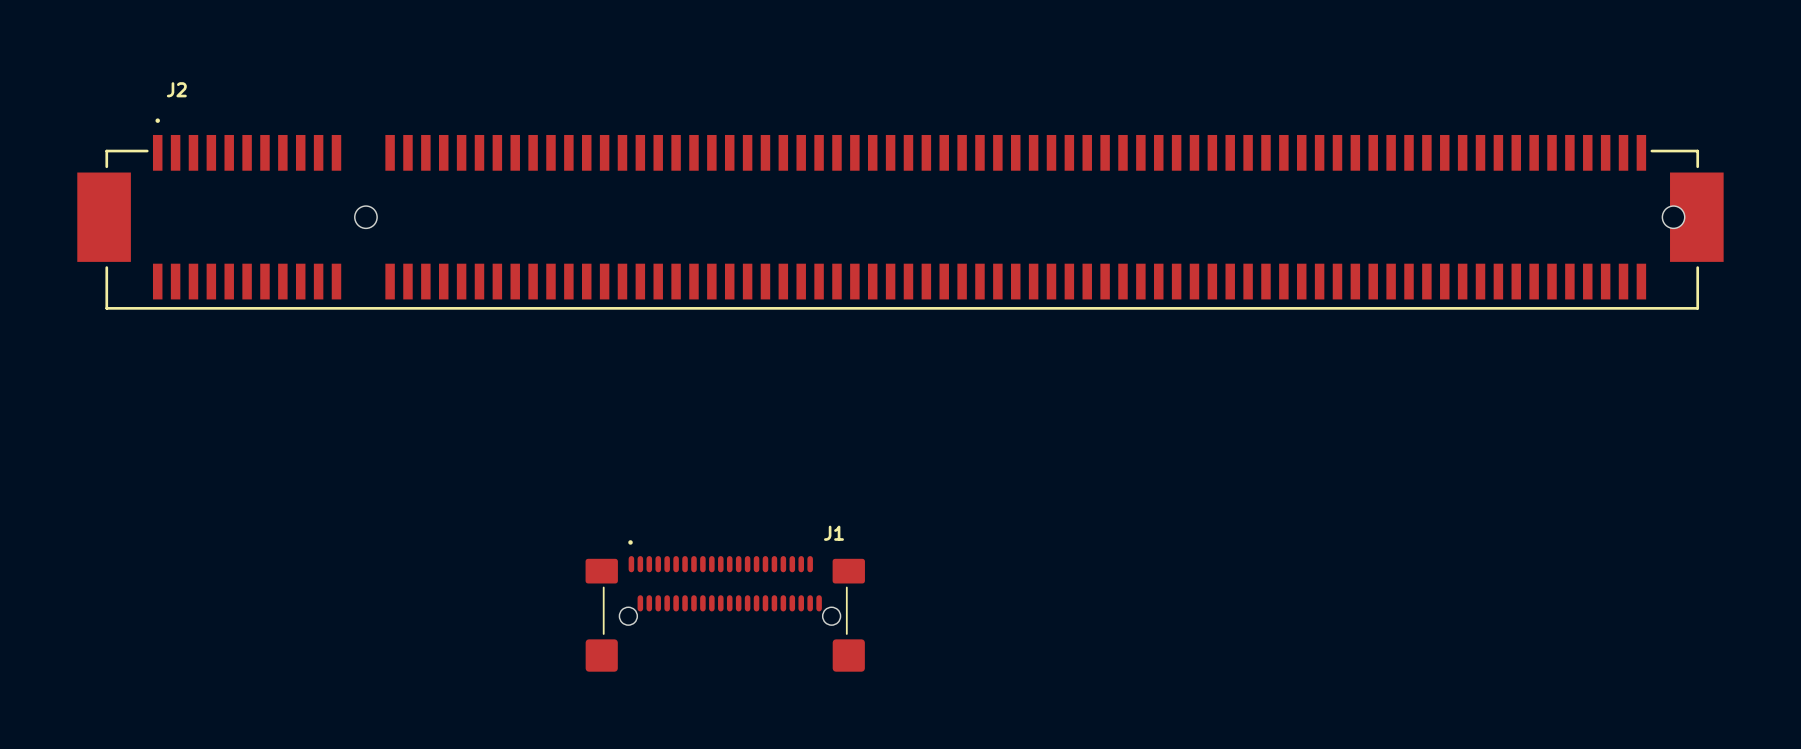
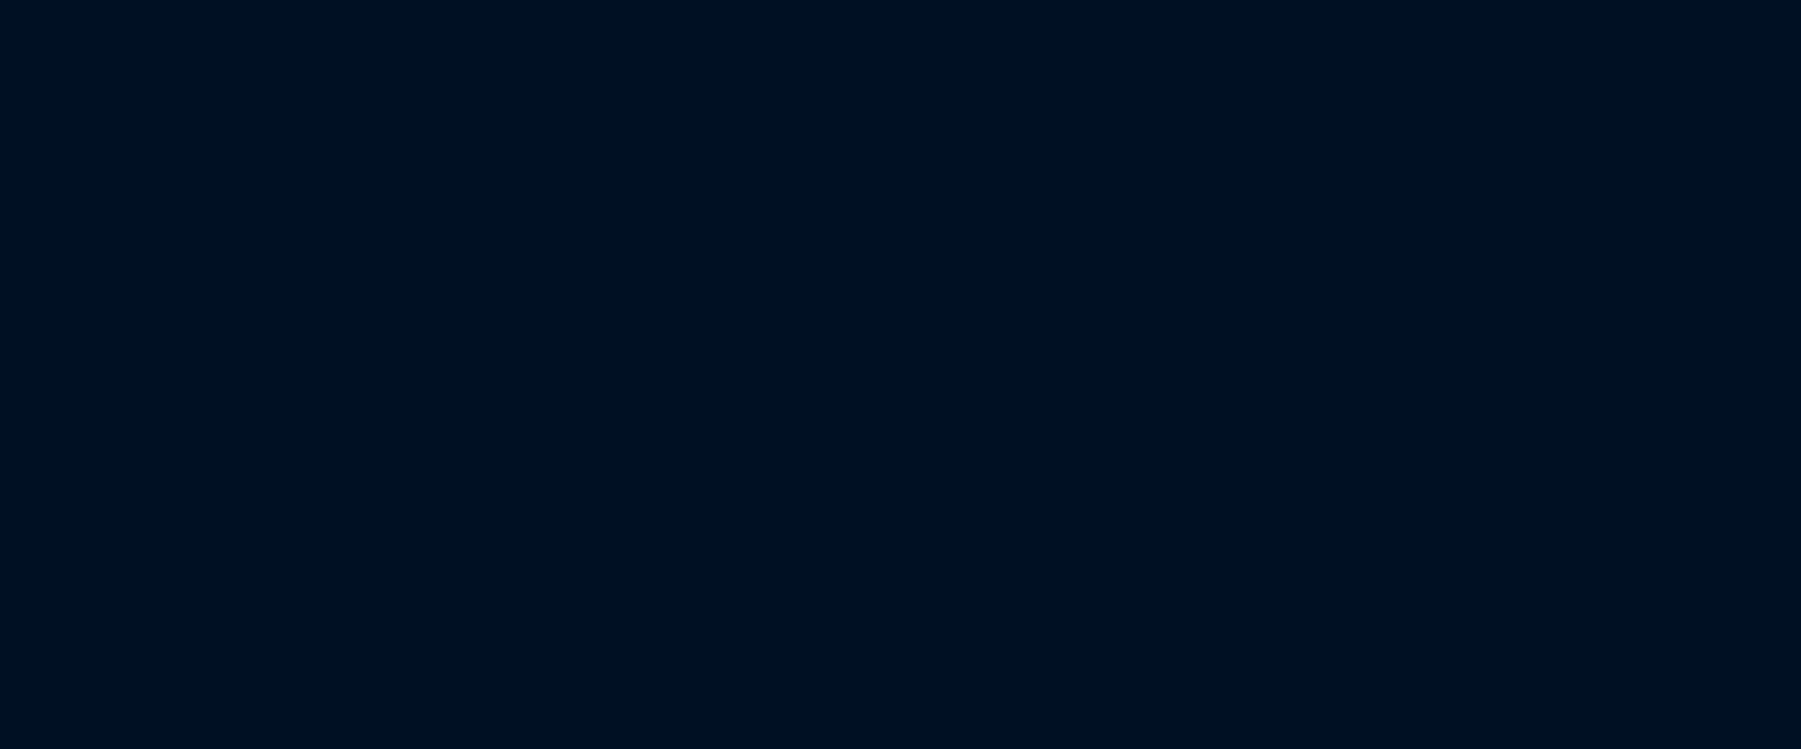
J2: (900, 214) -> none
J1: (725, 605) -> none

